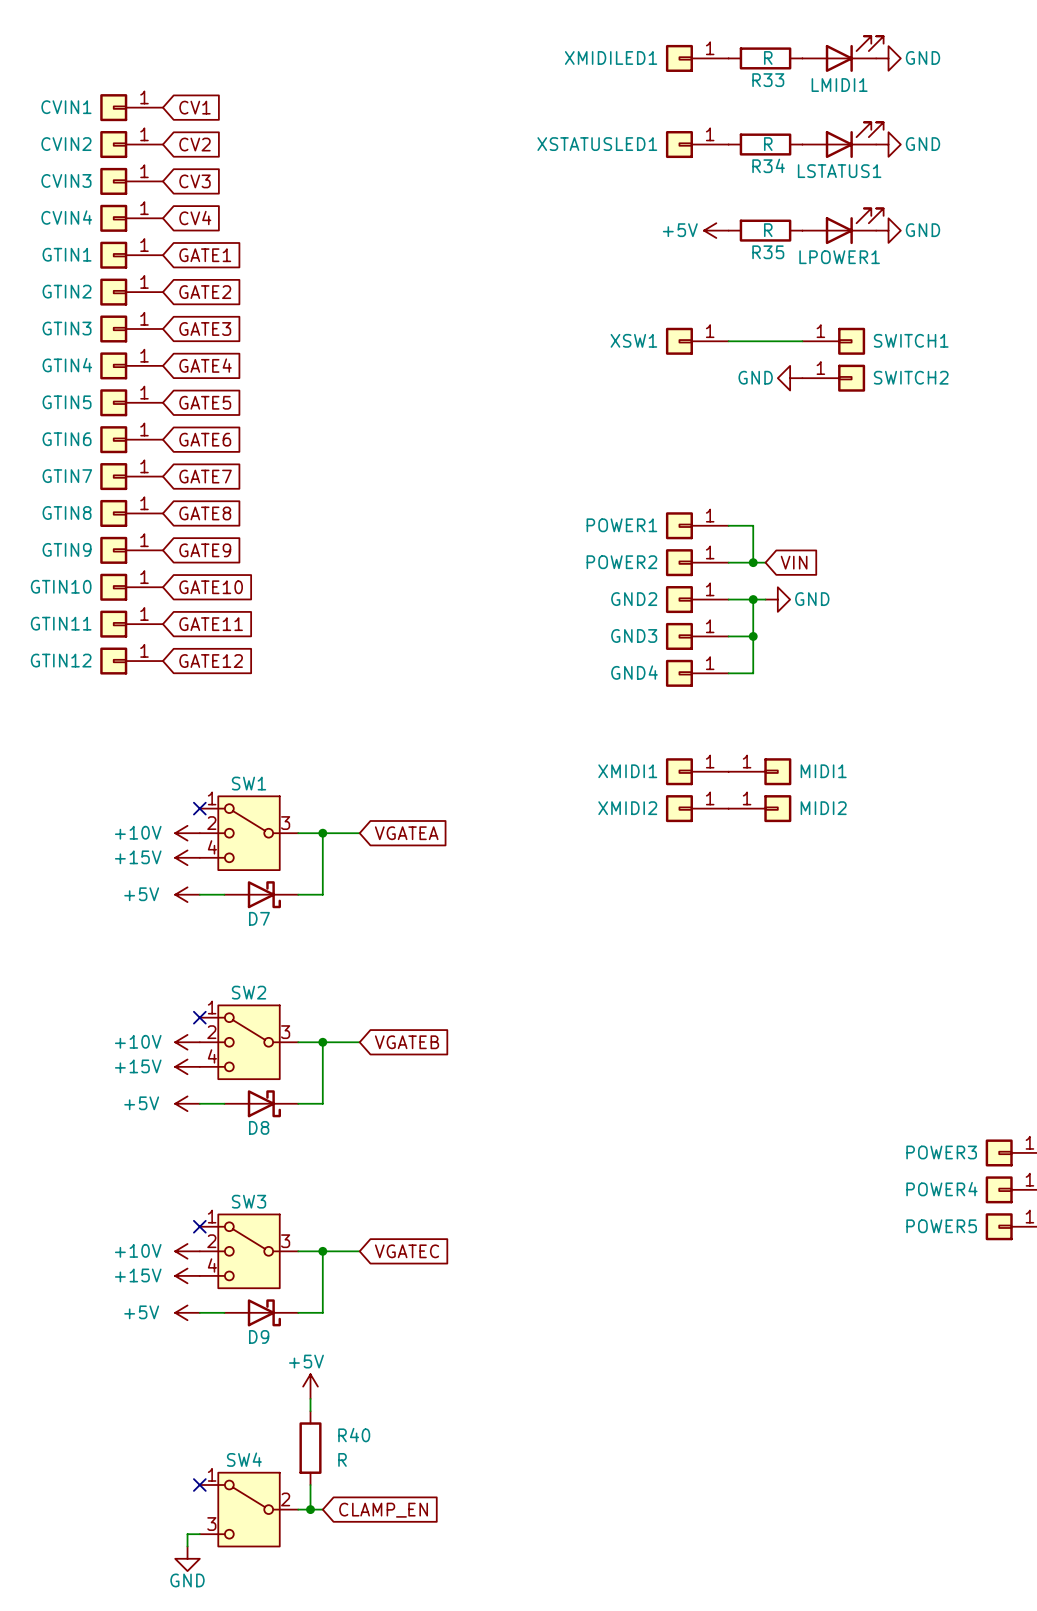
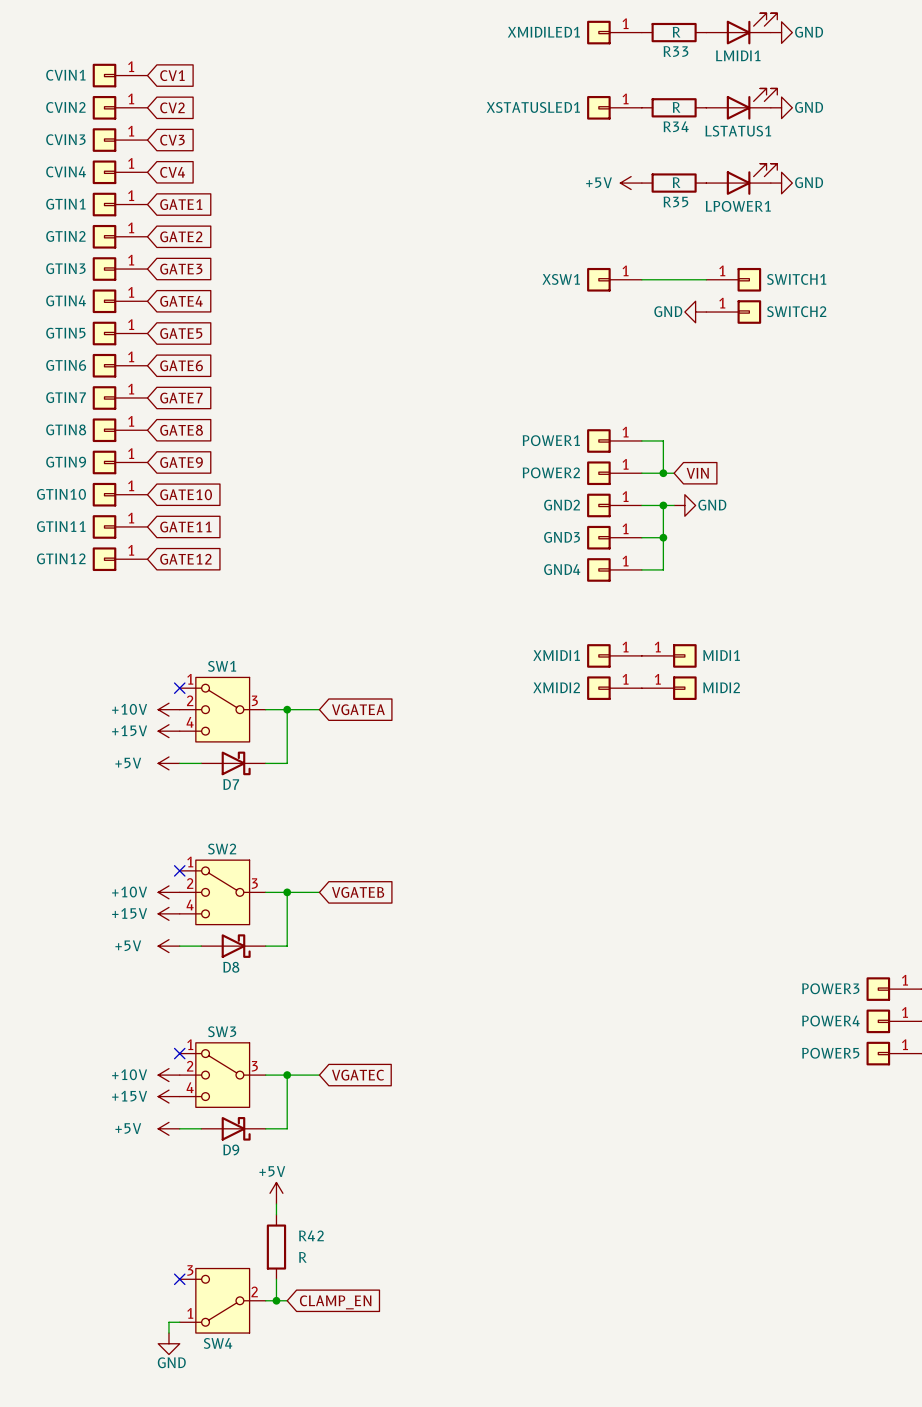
R40 name: R40 (354, 1435) -> R42 (311, 1235)
SW4 flip: as is (249, 1509) -> up-down (222, 1300)

